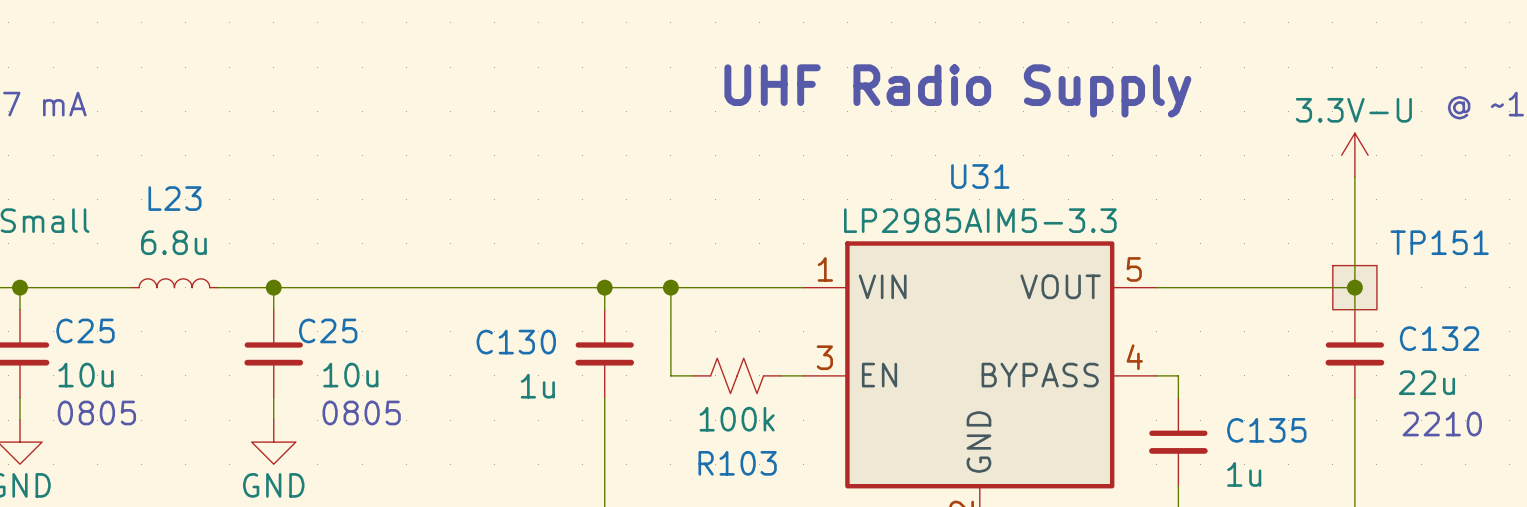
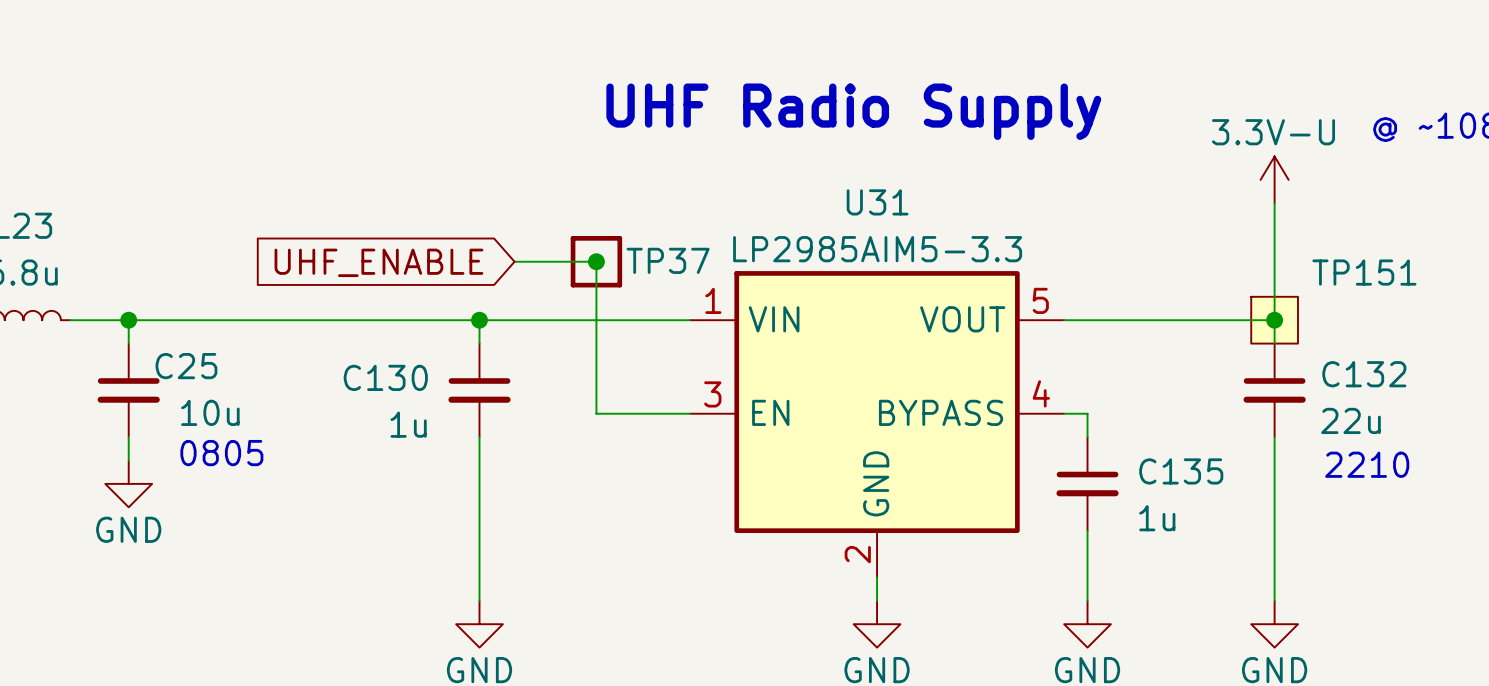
wire: none -> (514, 261) (596, 261) (596, 413) (666, 413)
TP37: none -> (596, 261)
global label: none -> UHF_ENABLE (378, 262)
wire: (670, 287) (670, 375) (692, 375) -> none
junction position: (670, 287) -> (596, 261)
R103: 100k (737, 375) -> none

